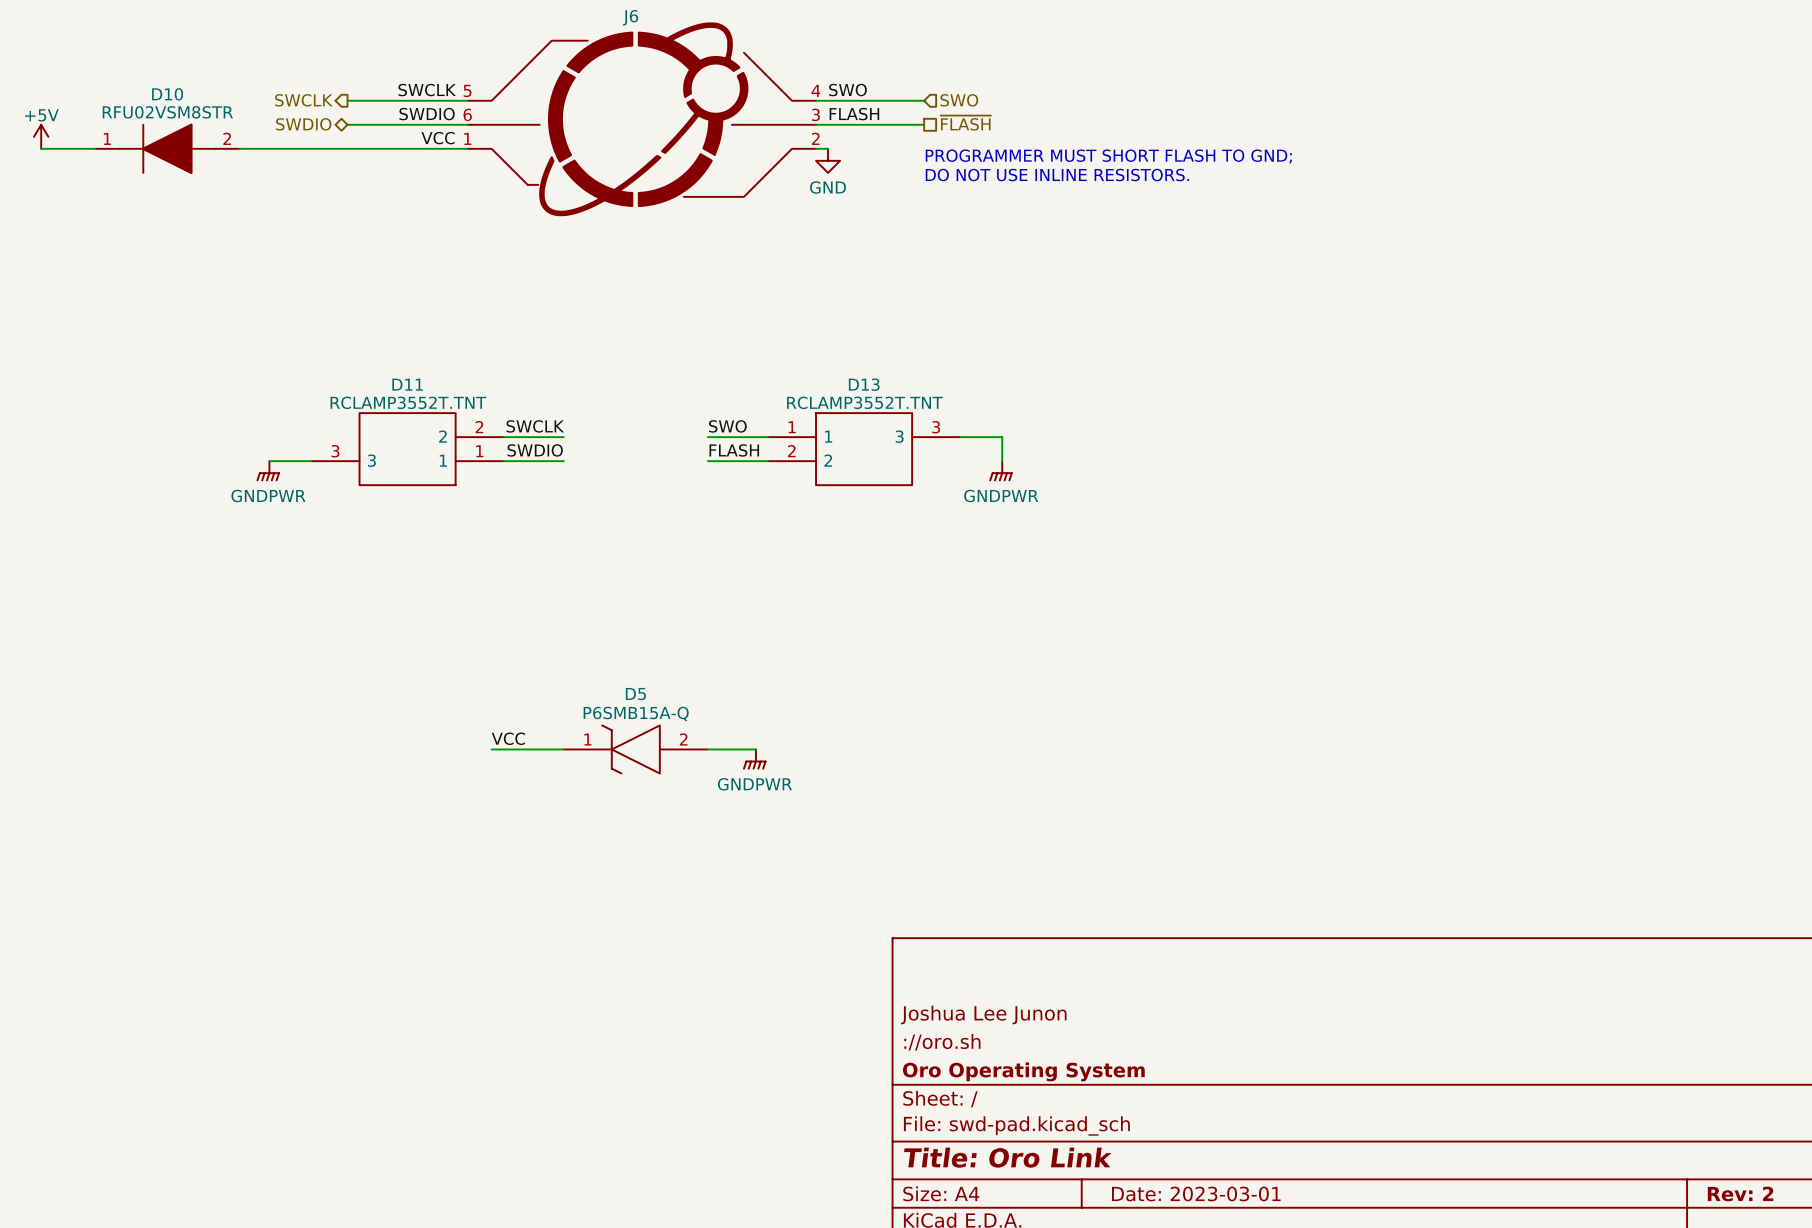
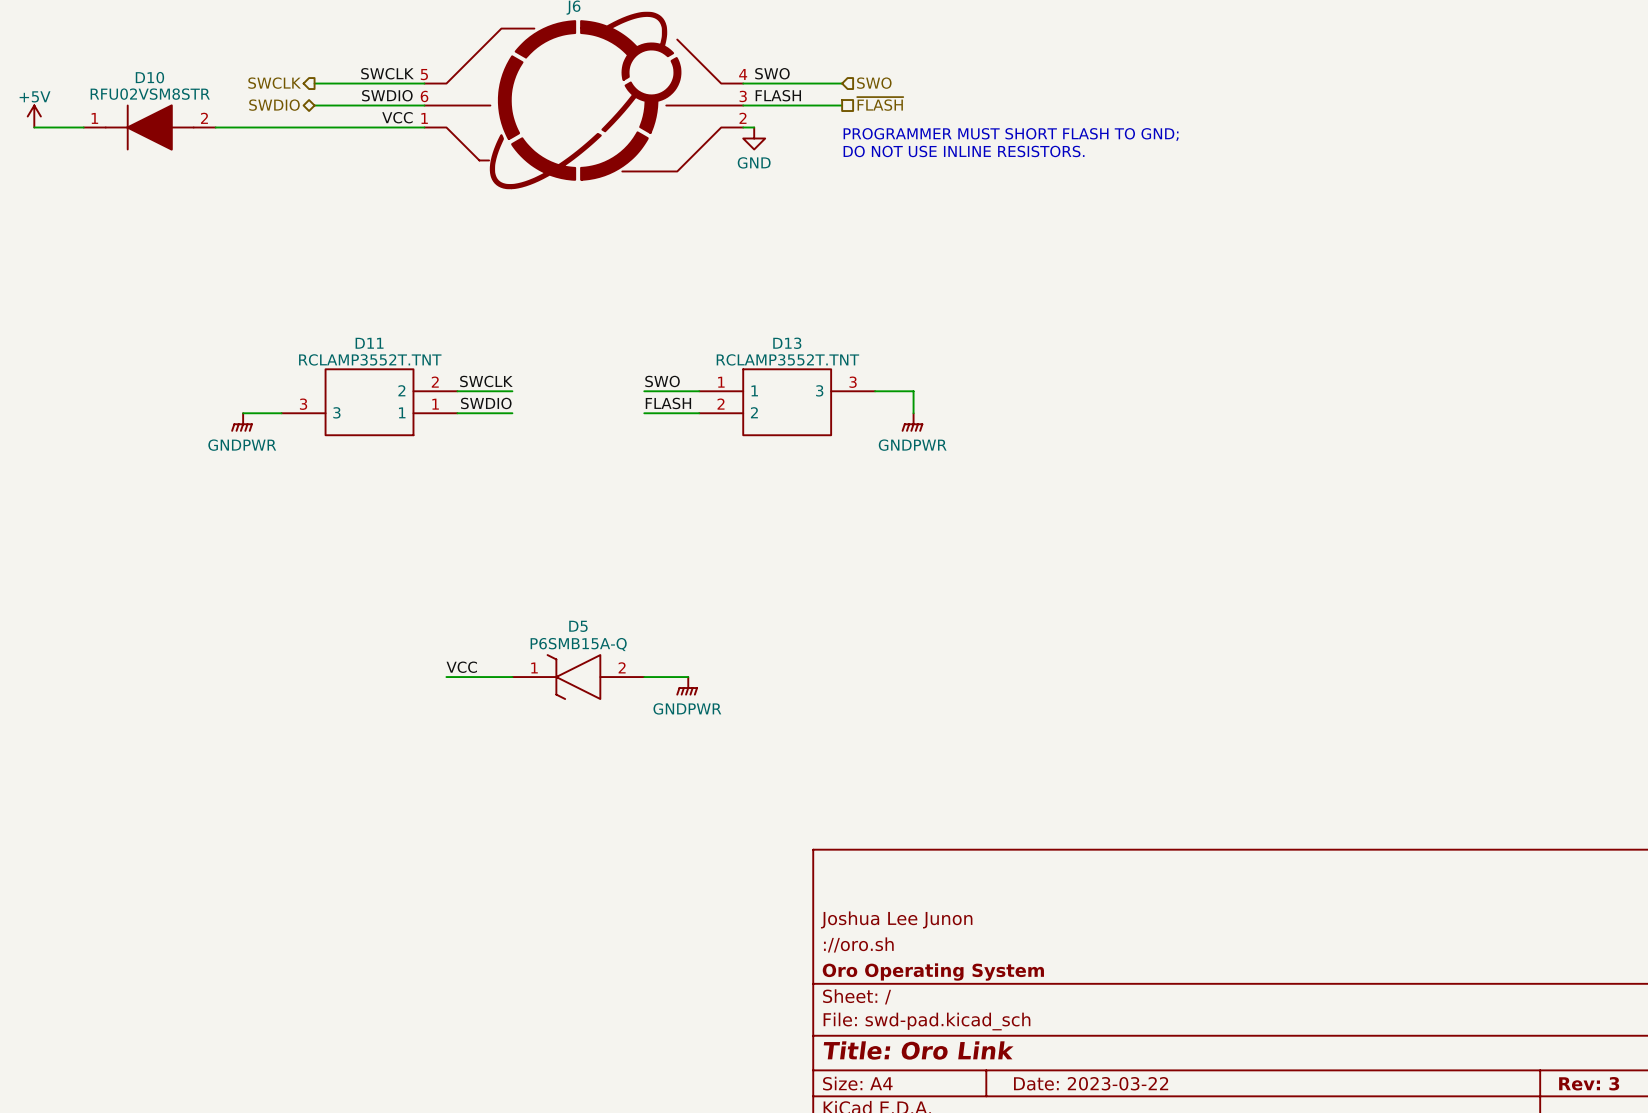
title block: Date: 2023-03-01 (1196, 1193) -> Date: 2023-03-22 (1091, 1083)
title block: Rev: 2 (1740, 1193) -> Rev: 3 (1589, 1083)

